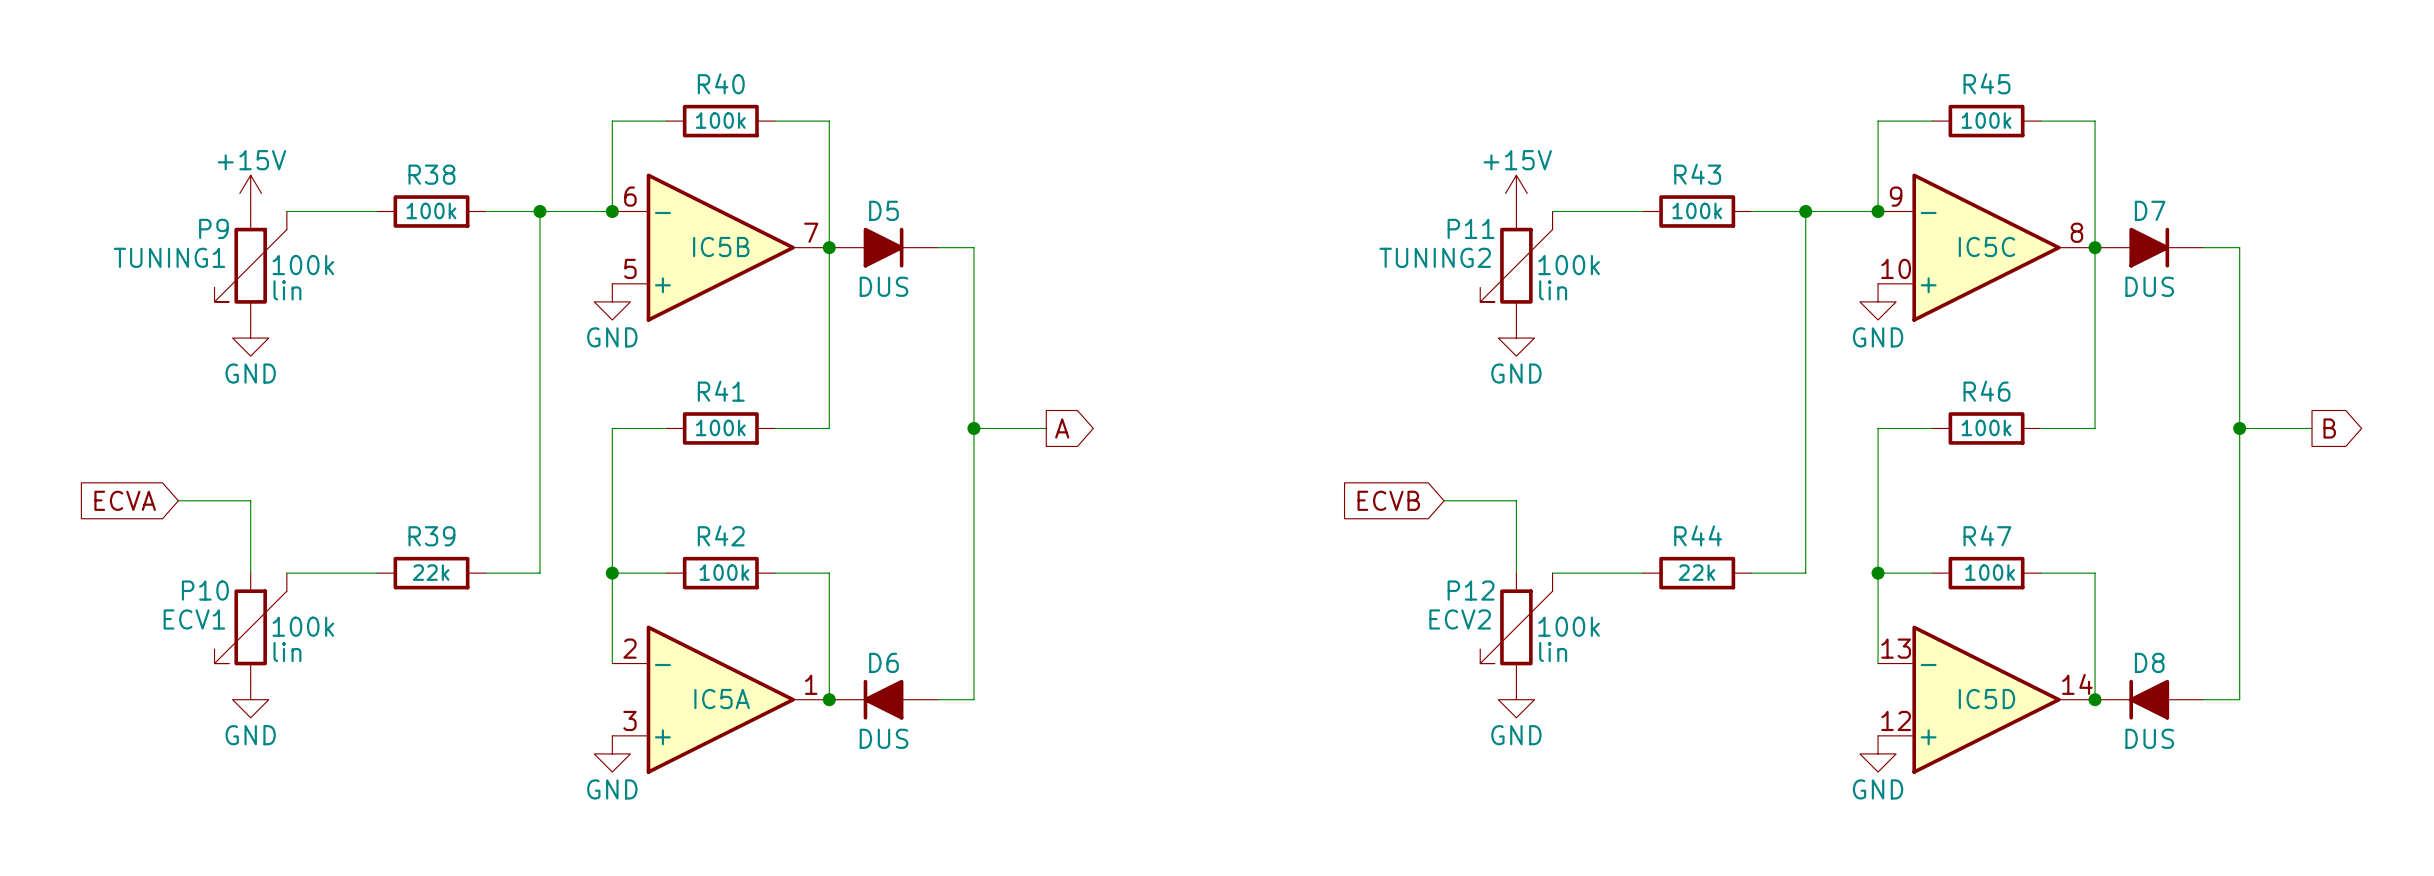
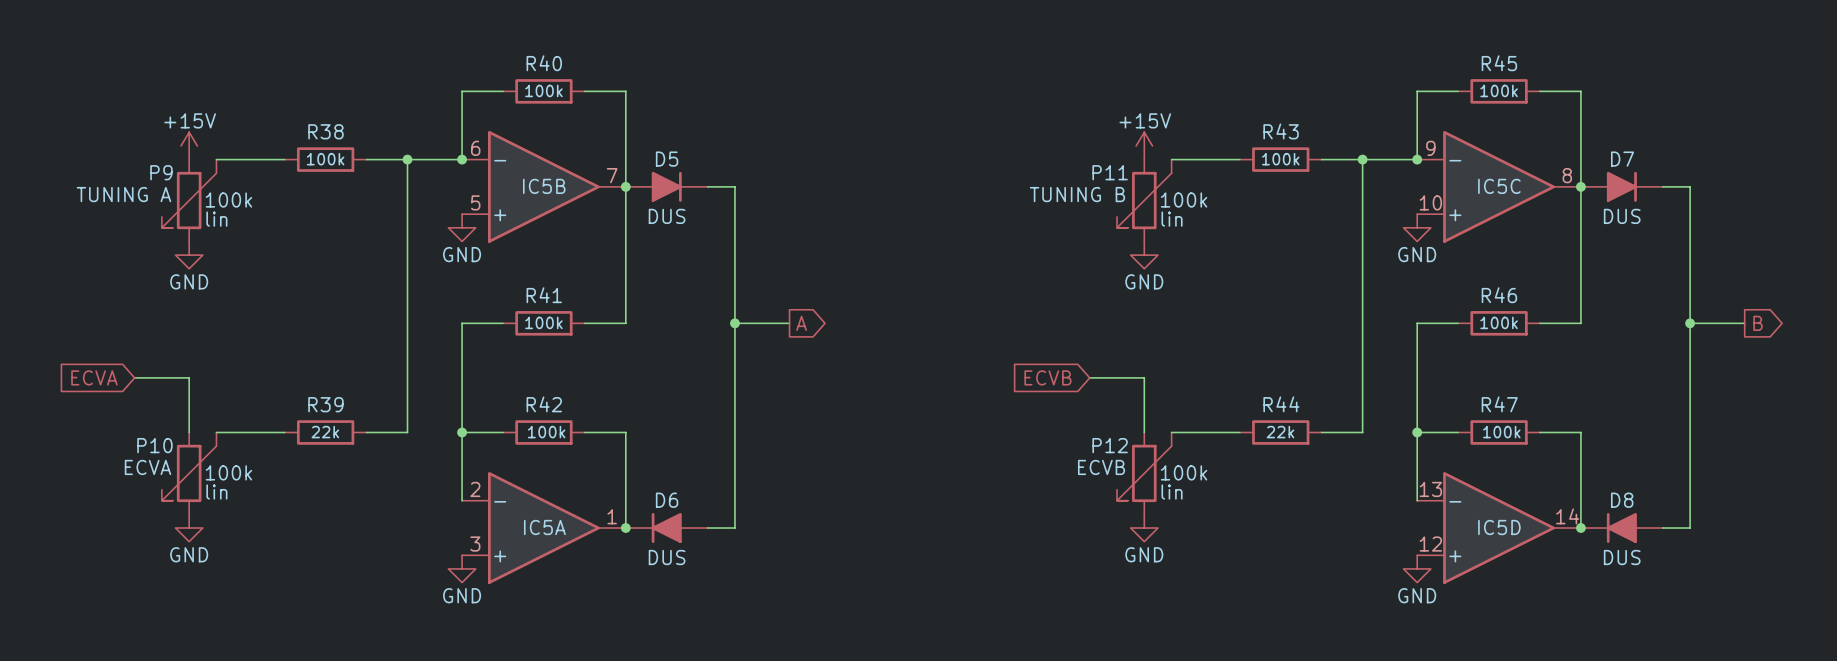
P9 text: TUNING1 (169, 257) -> TUNING A (123, 194)
P11 text: TUNING2 (1435, 257) -> TUNING B (1077, 194)
P10 text: ECV1 (194, 619) -> ECVA (148, 467)
P12 text: ECV2 (1460, 619) -> ECVB (1101, 467)

